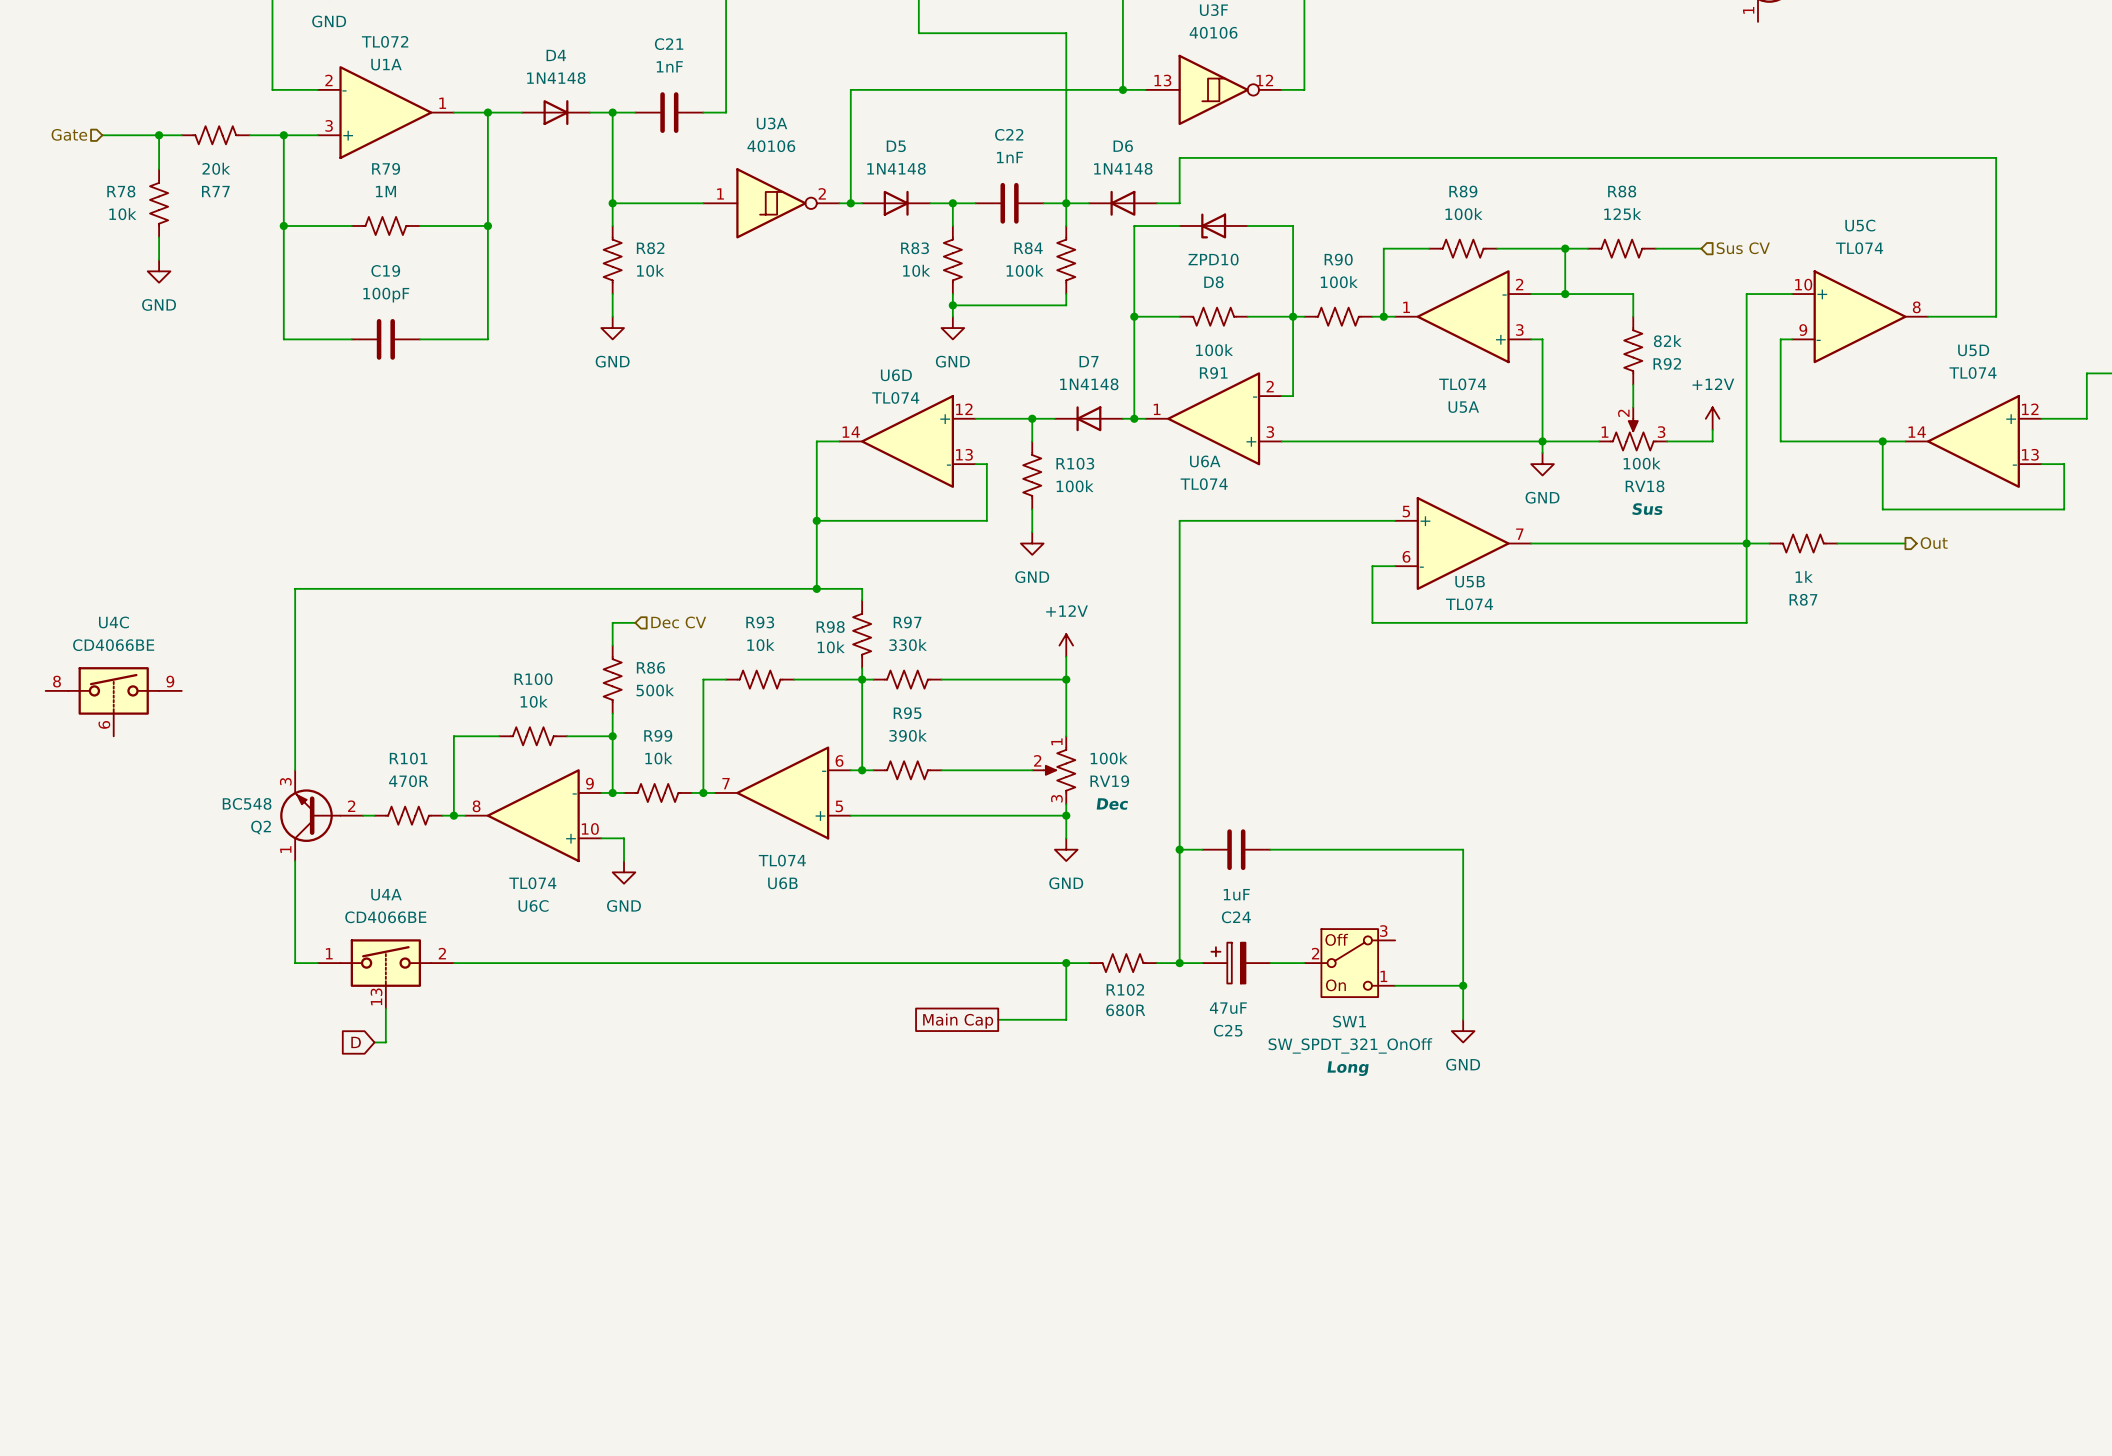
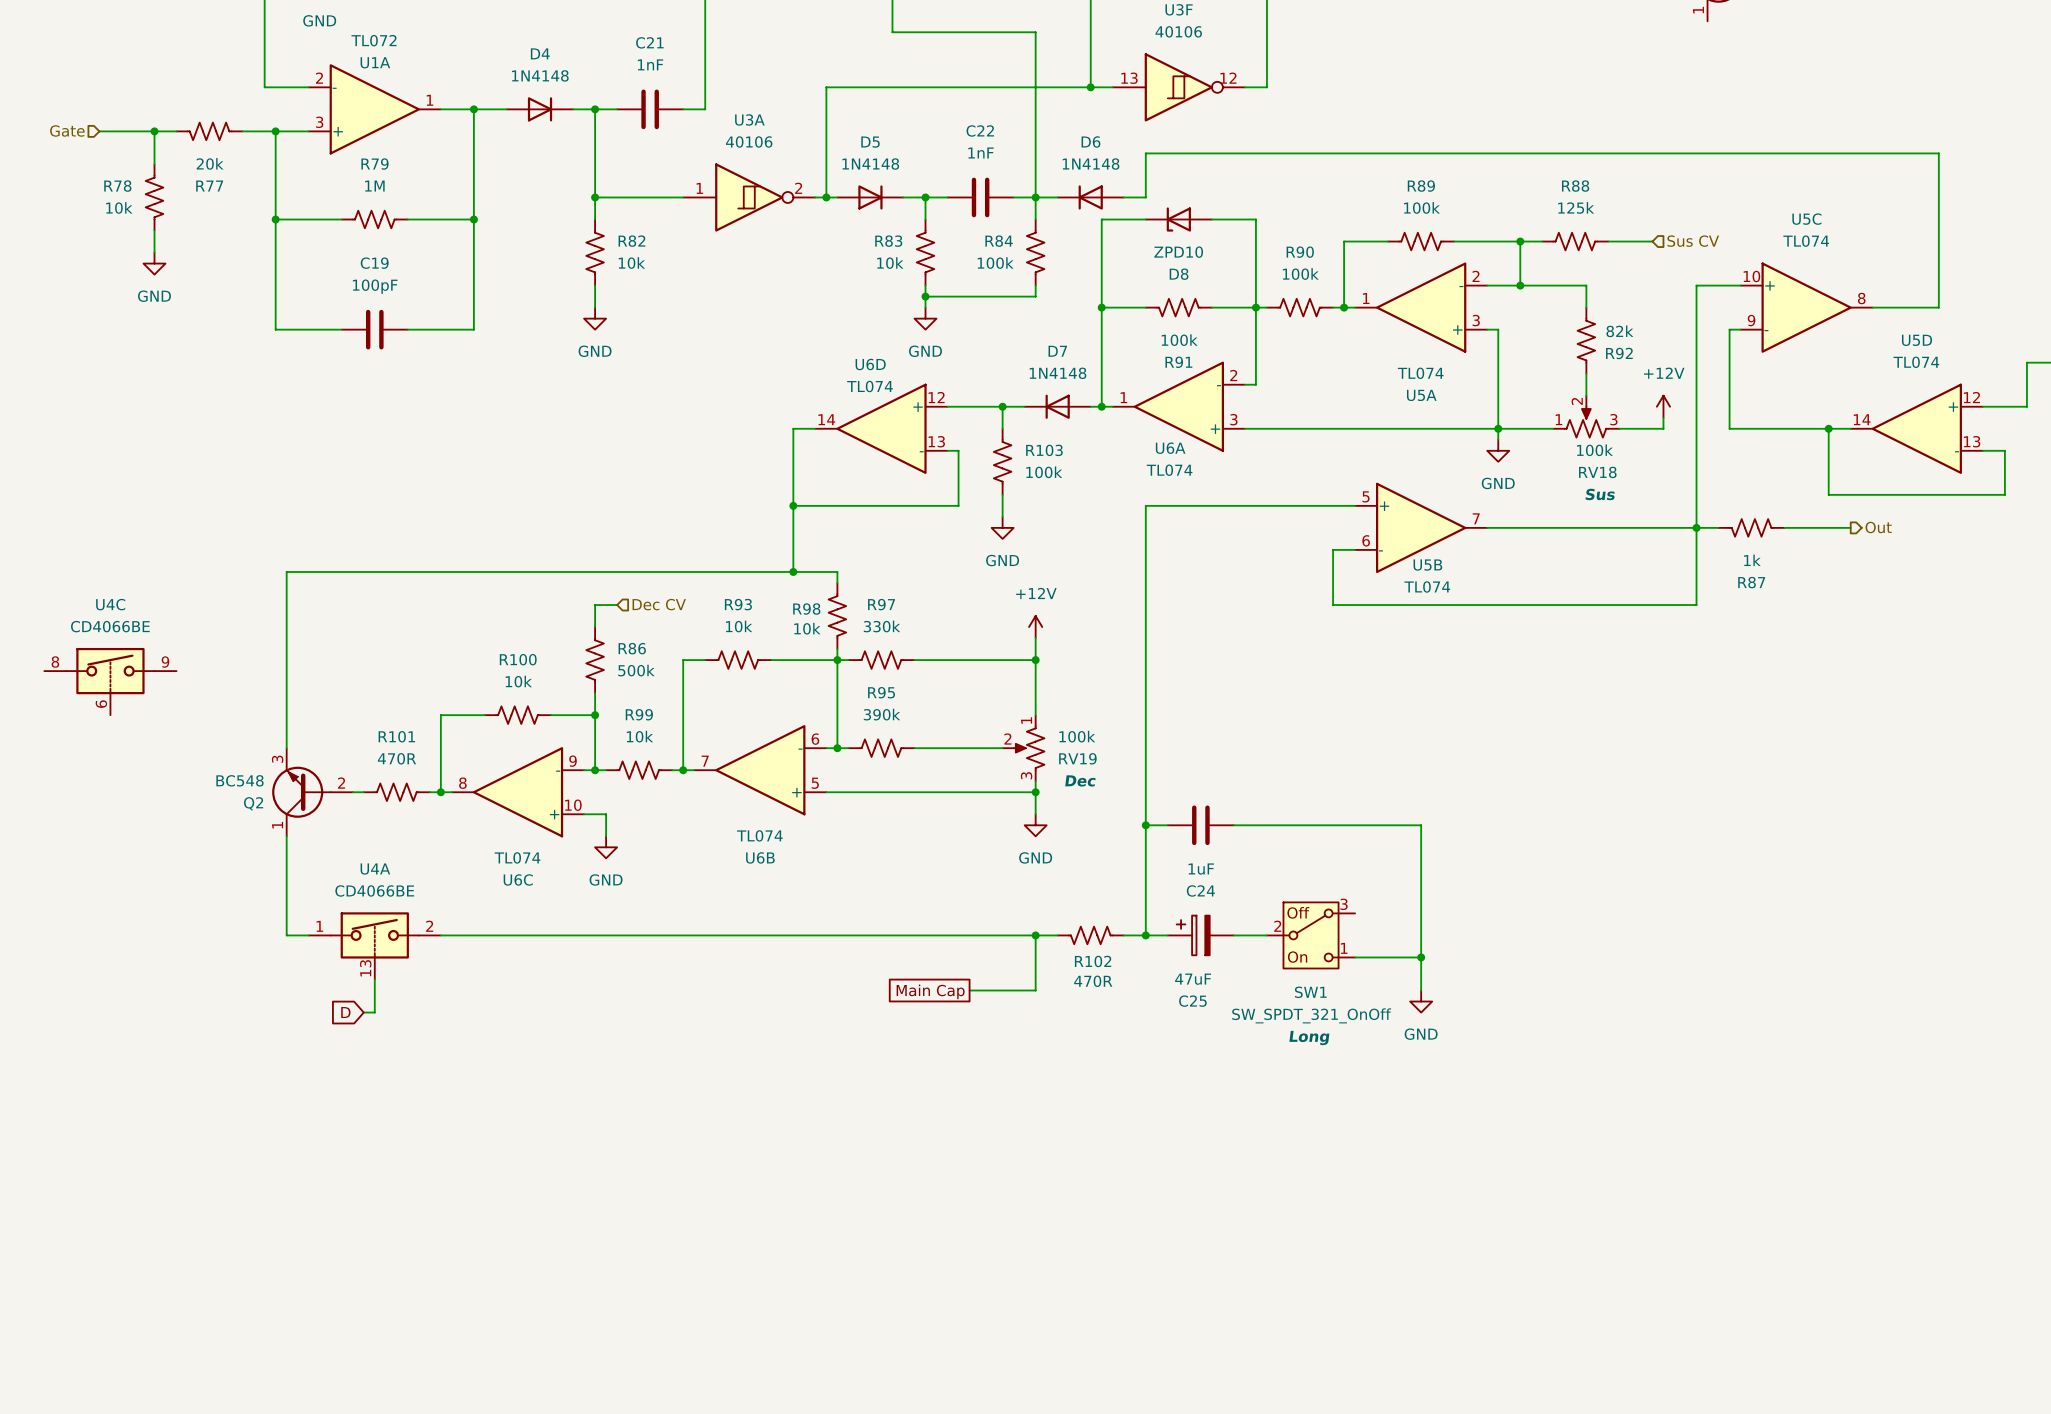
R102 value: 680R (1125, 1010) -> 470R (1093, 981)

